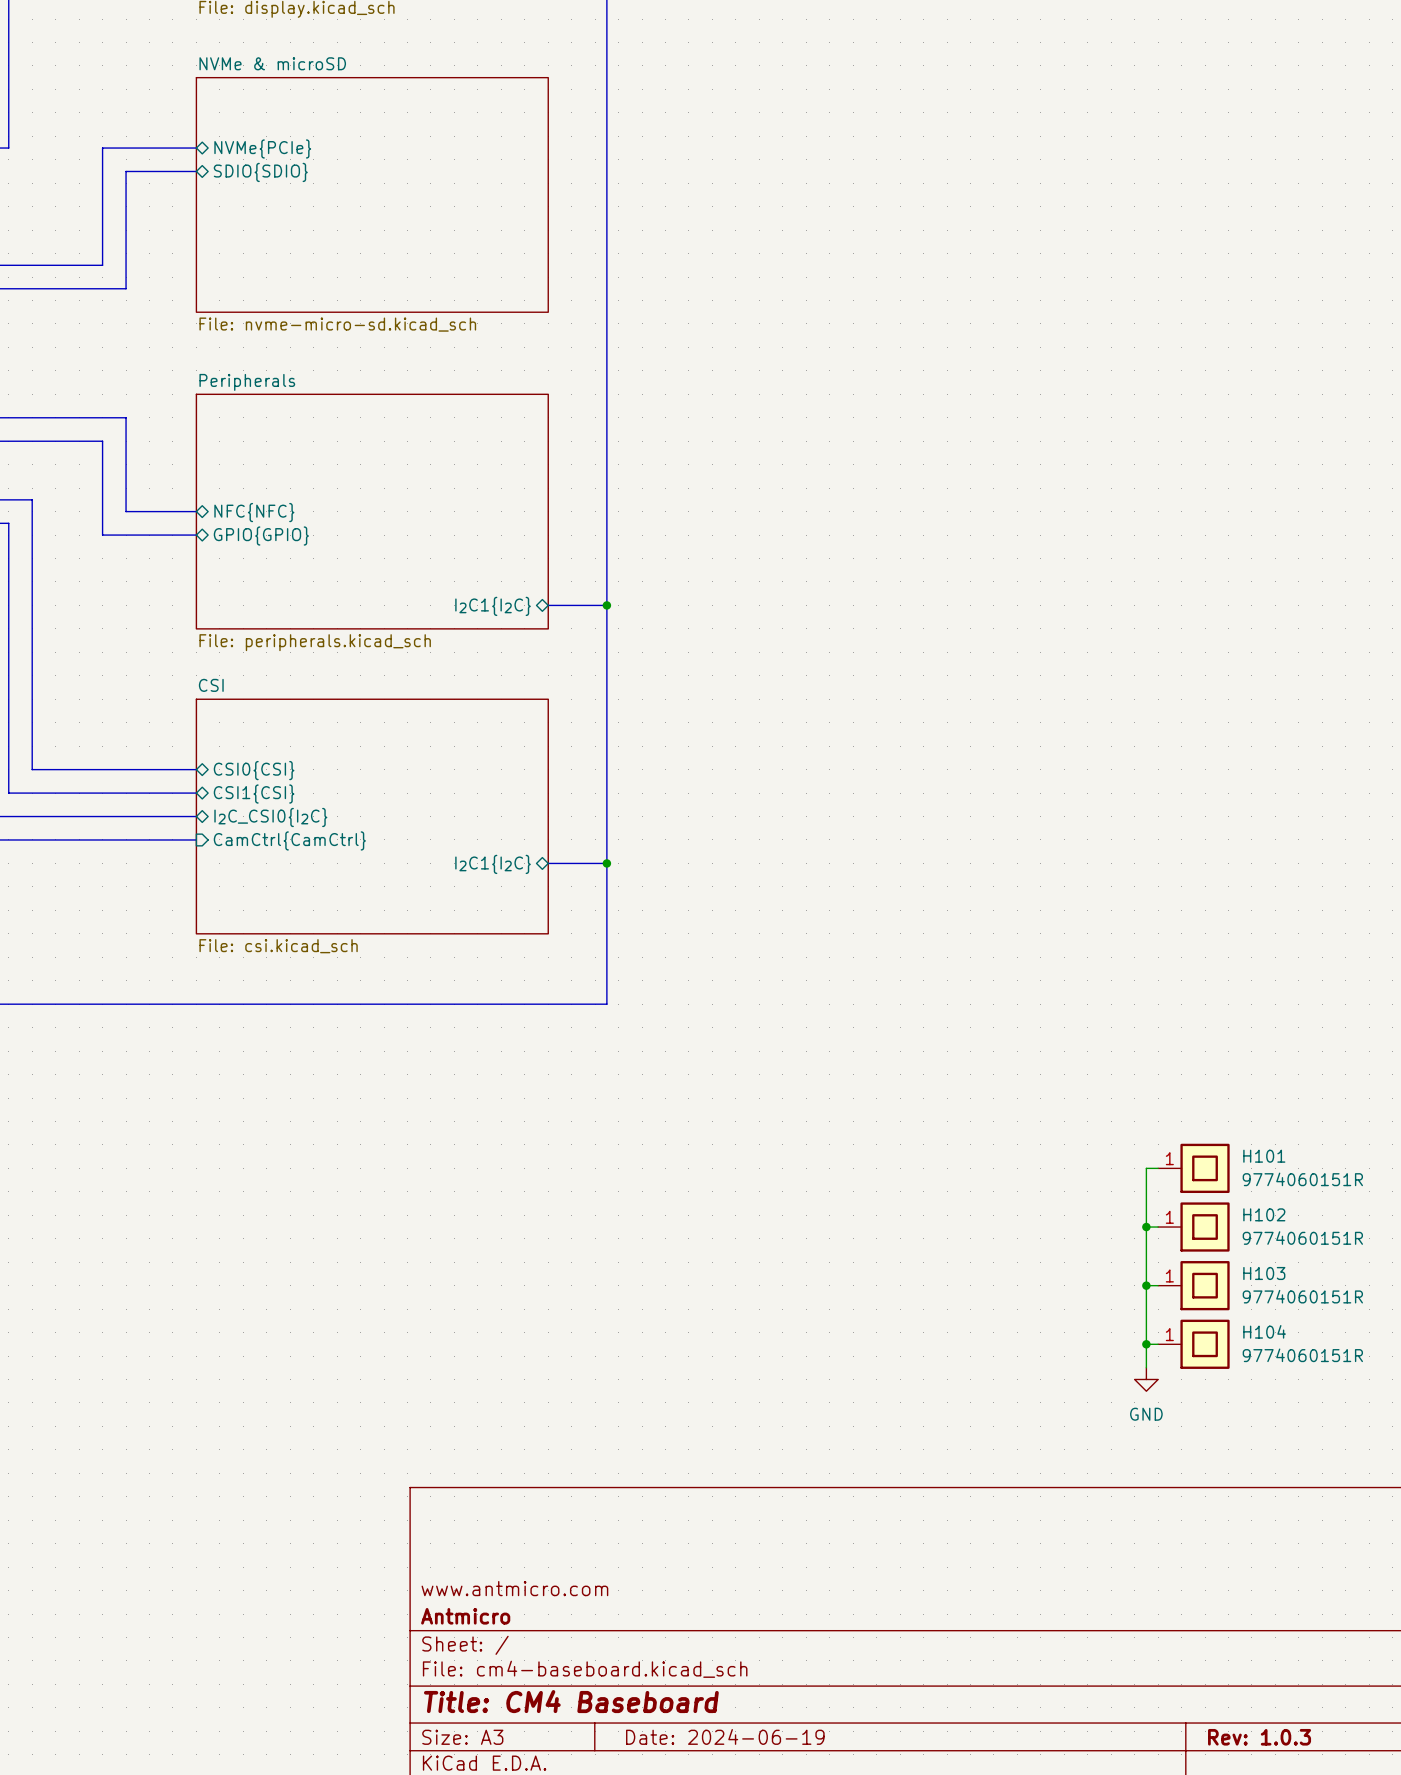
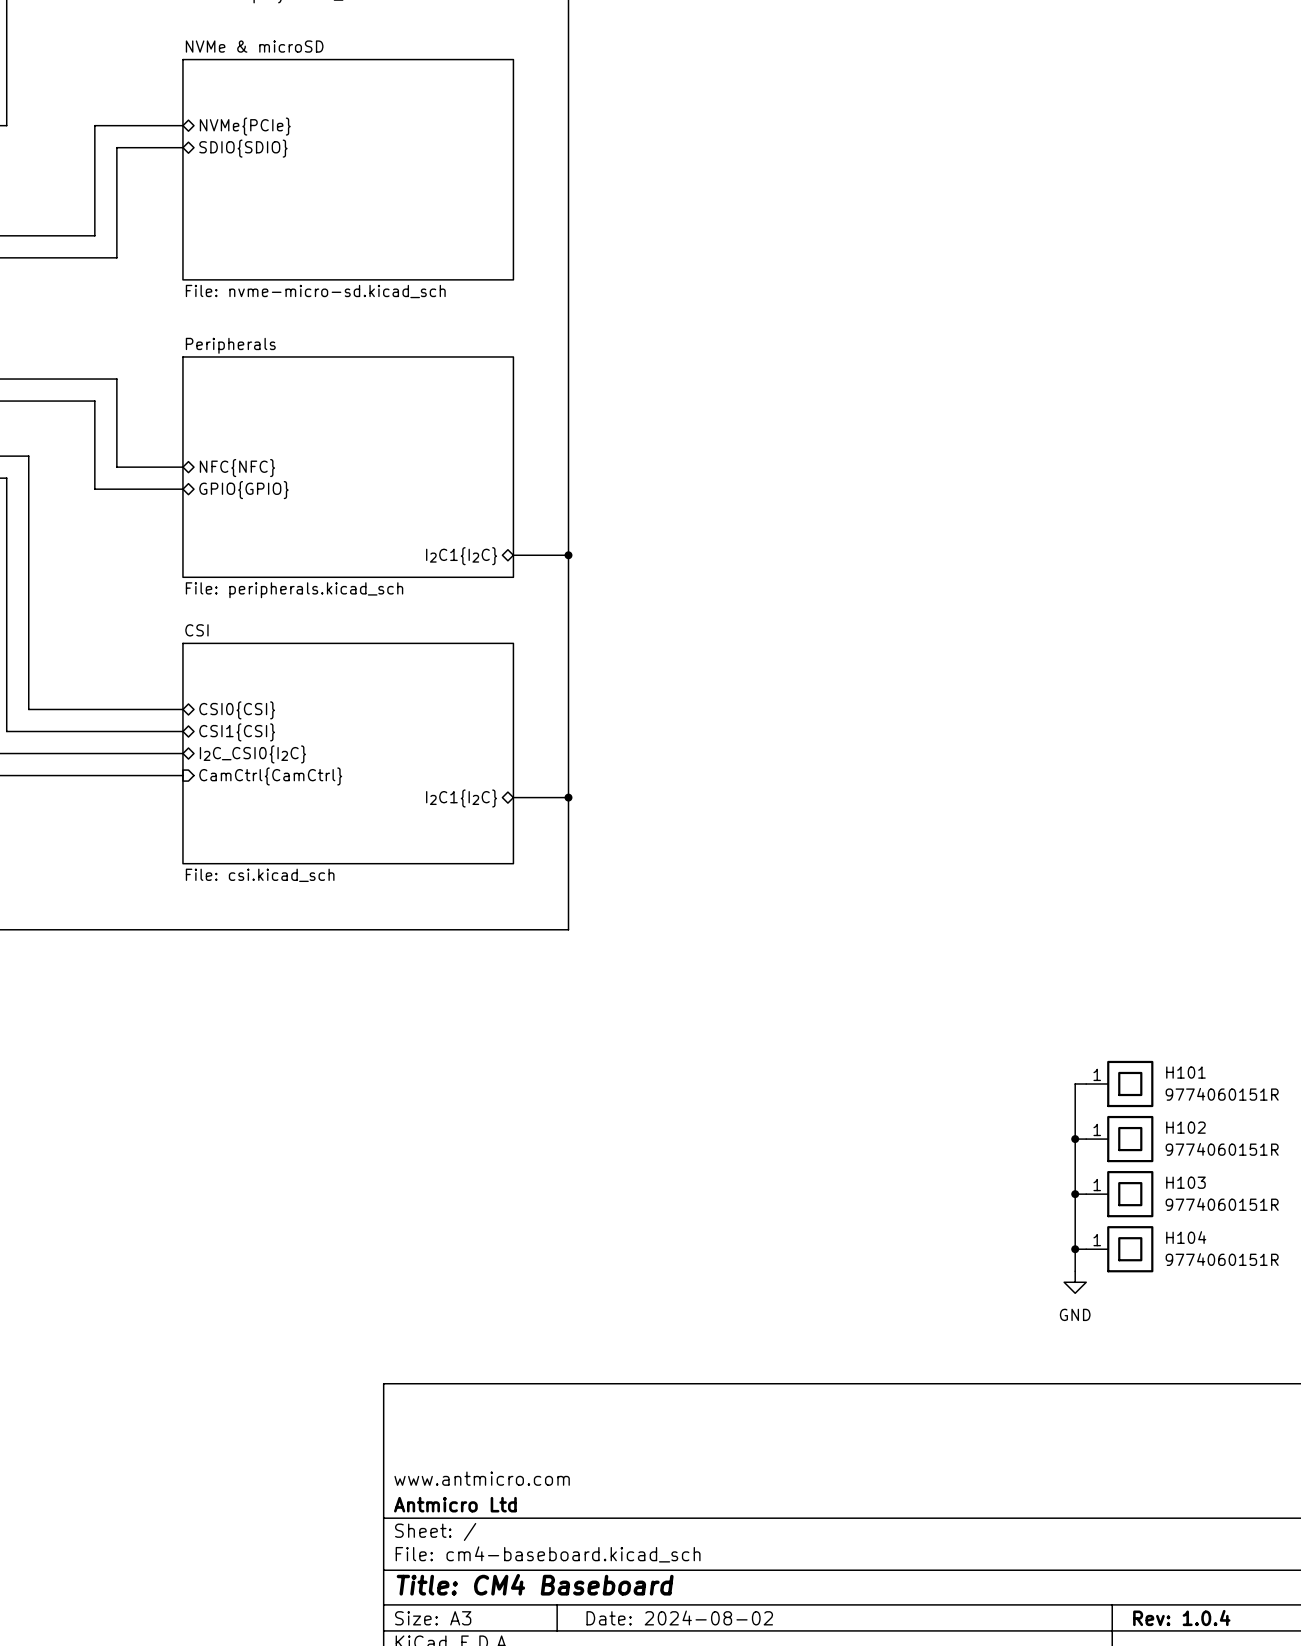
title block: Antmicro (465, 1616) -> Antmicro Ltd (455, 1504)
title block: Date: 2024-06-19 (725, 1736) -> Date: 2024-08-02 (679, 1618)
title block: Rev: 1.0.3 (1259, 1737) -> Rev: 1.0.4 (1181, 1618)

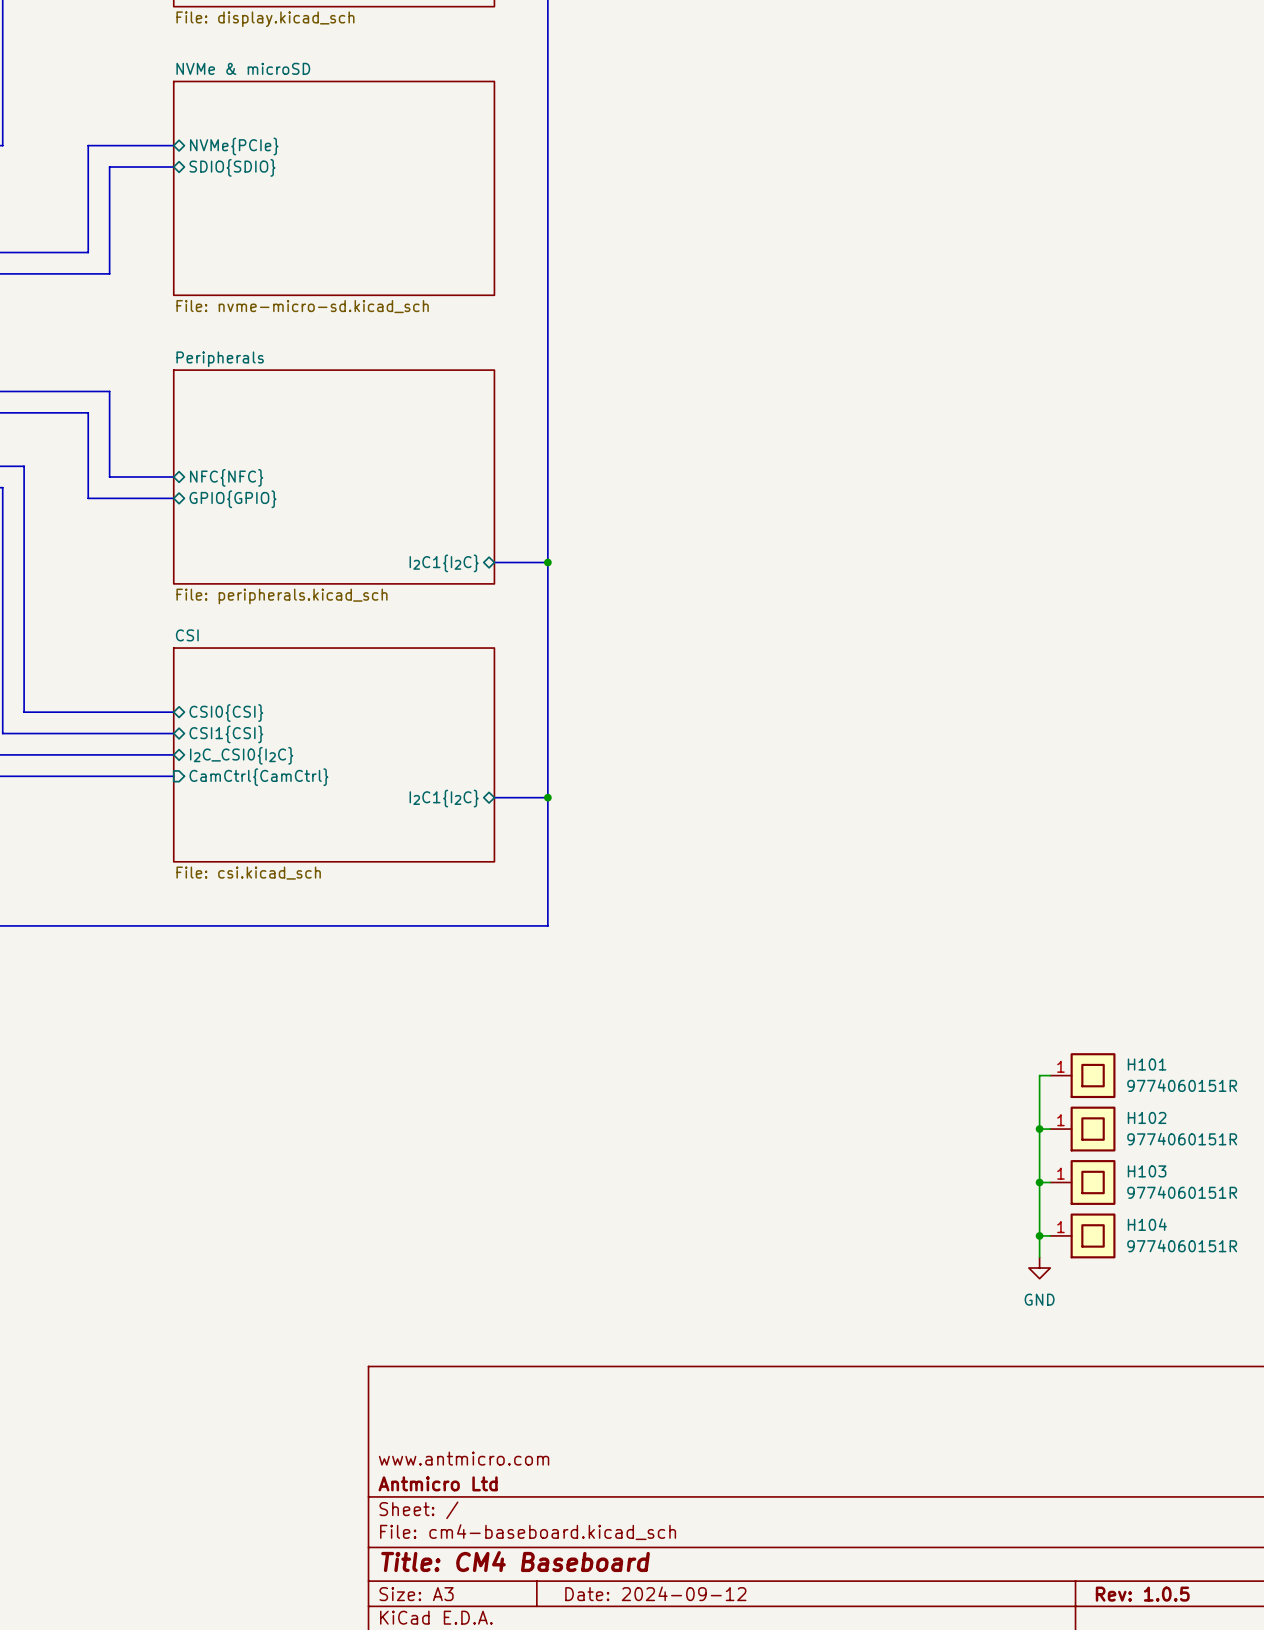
title block: Date: 2024-08-02 (679, 1618) -> Date: 2024-09-12 (655, 1593)
title block: Rev: 1.0.4 (1181, 1618) -> Rev: 1.0.5 (1142, 1594)

